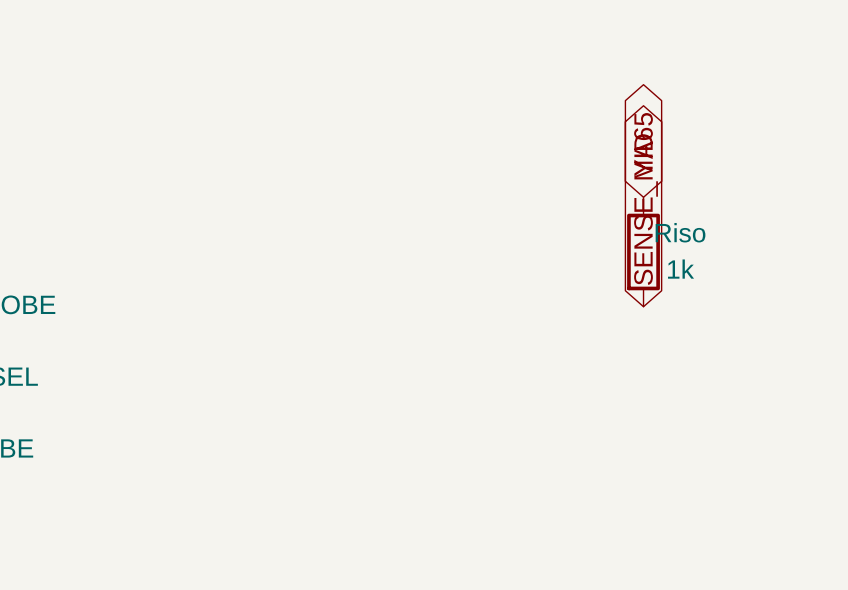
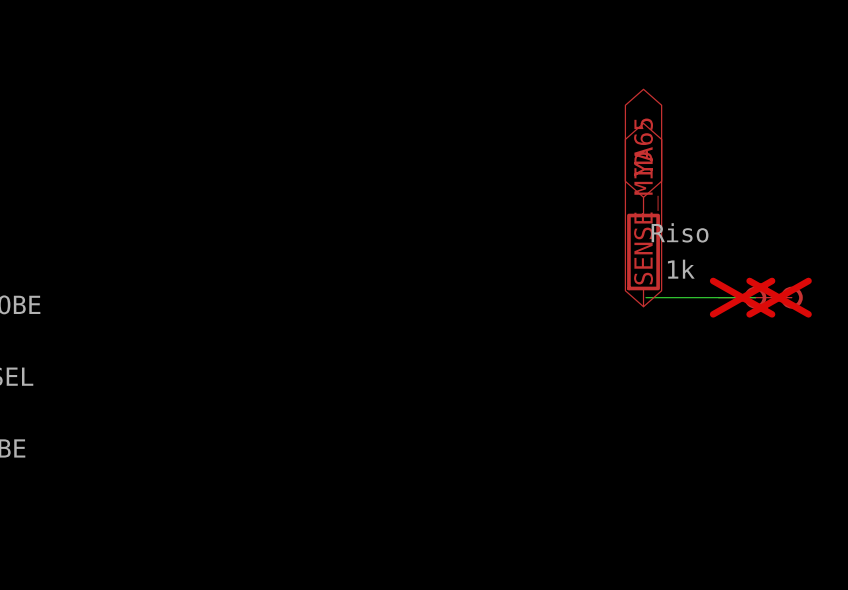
wire: none -> (645, 297) (755, 297)
part: none -> (742, 297)
part: none -> (779, 297)

